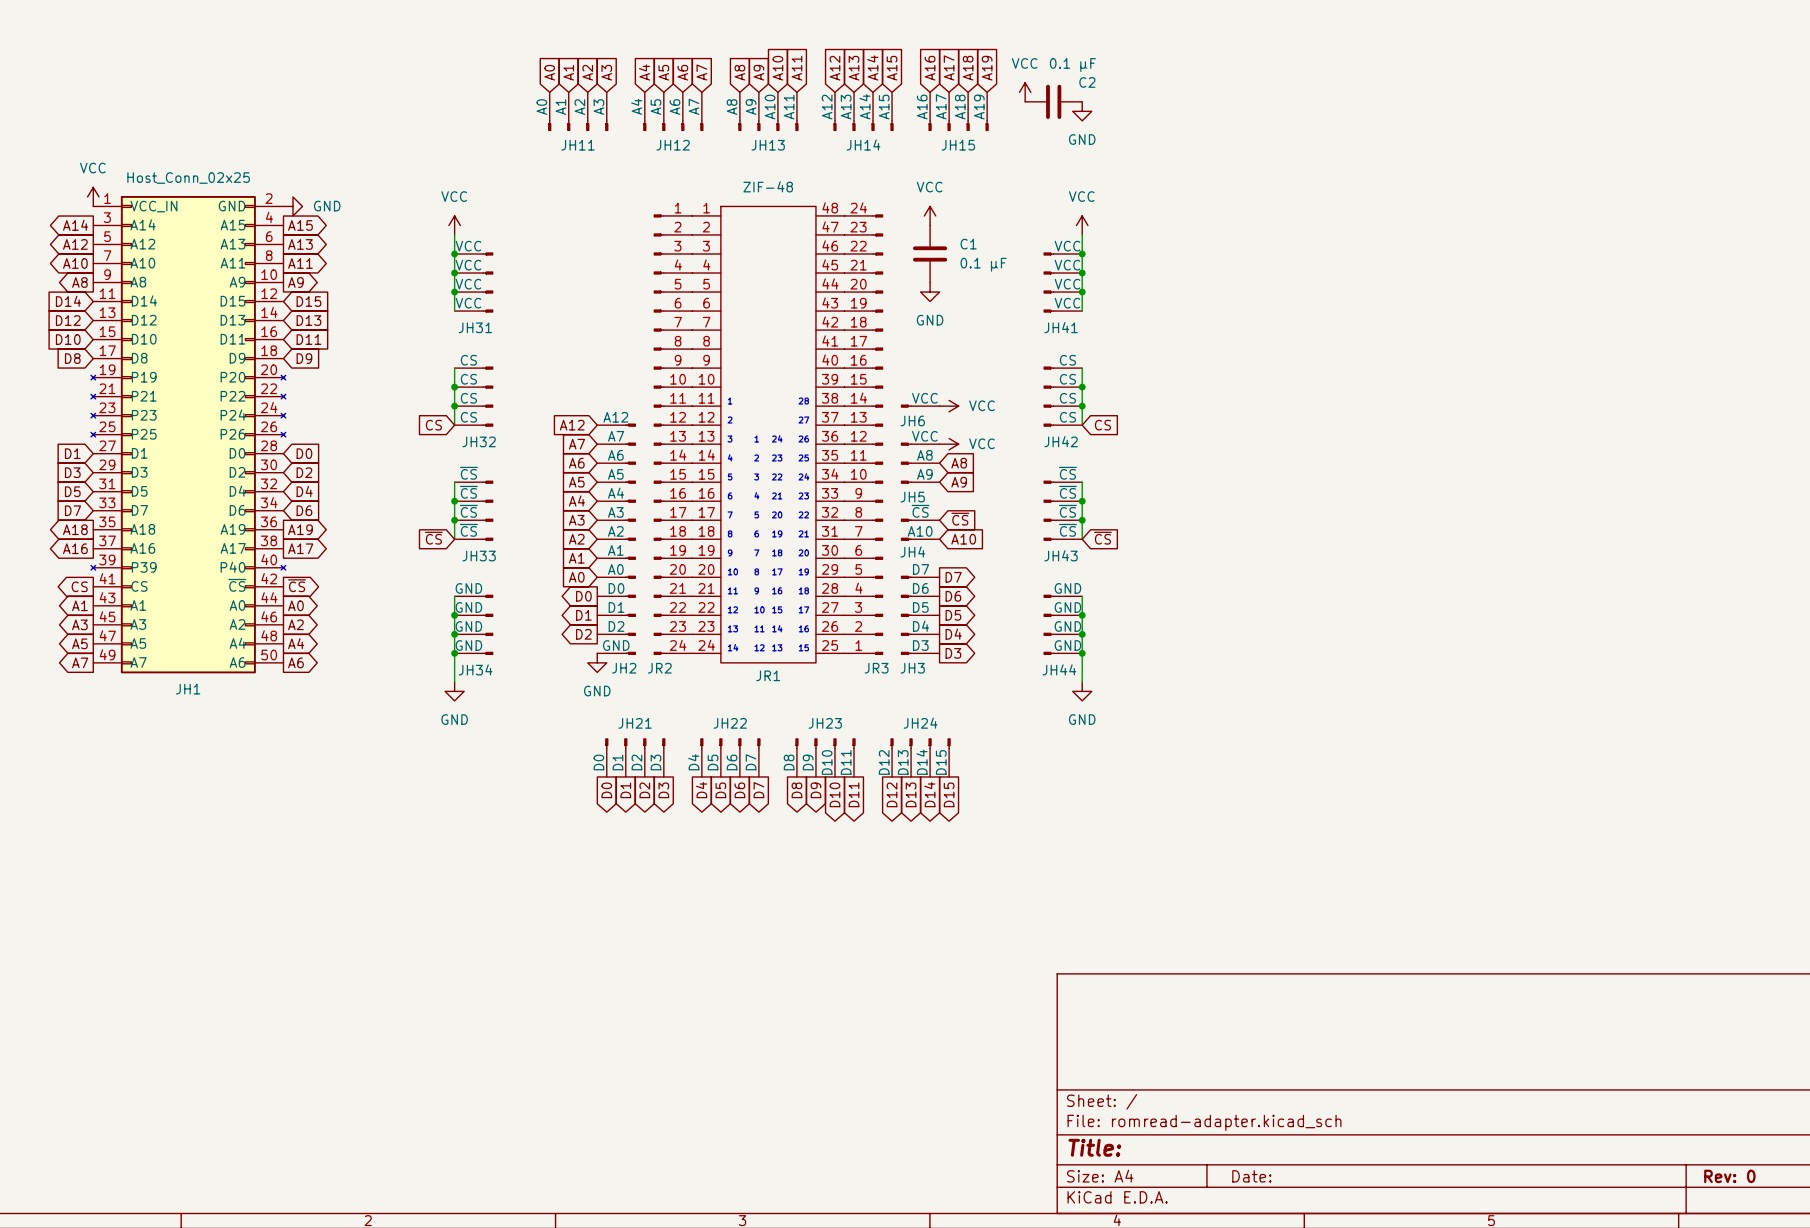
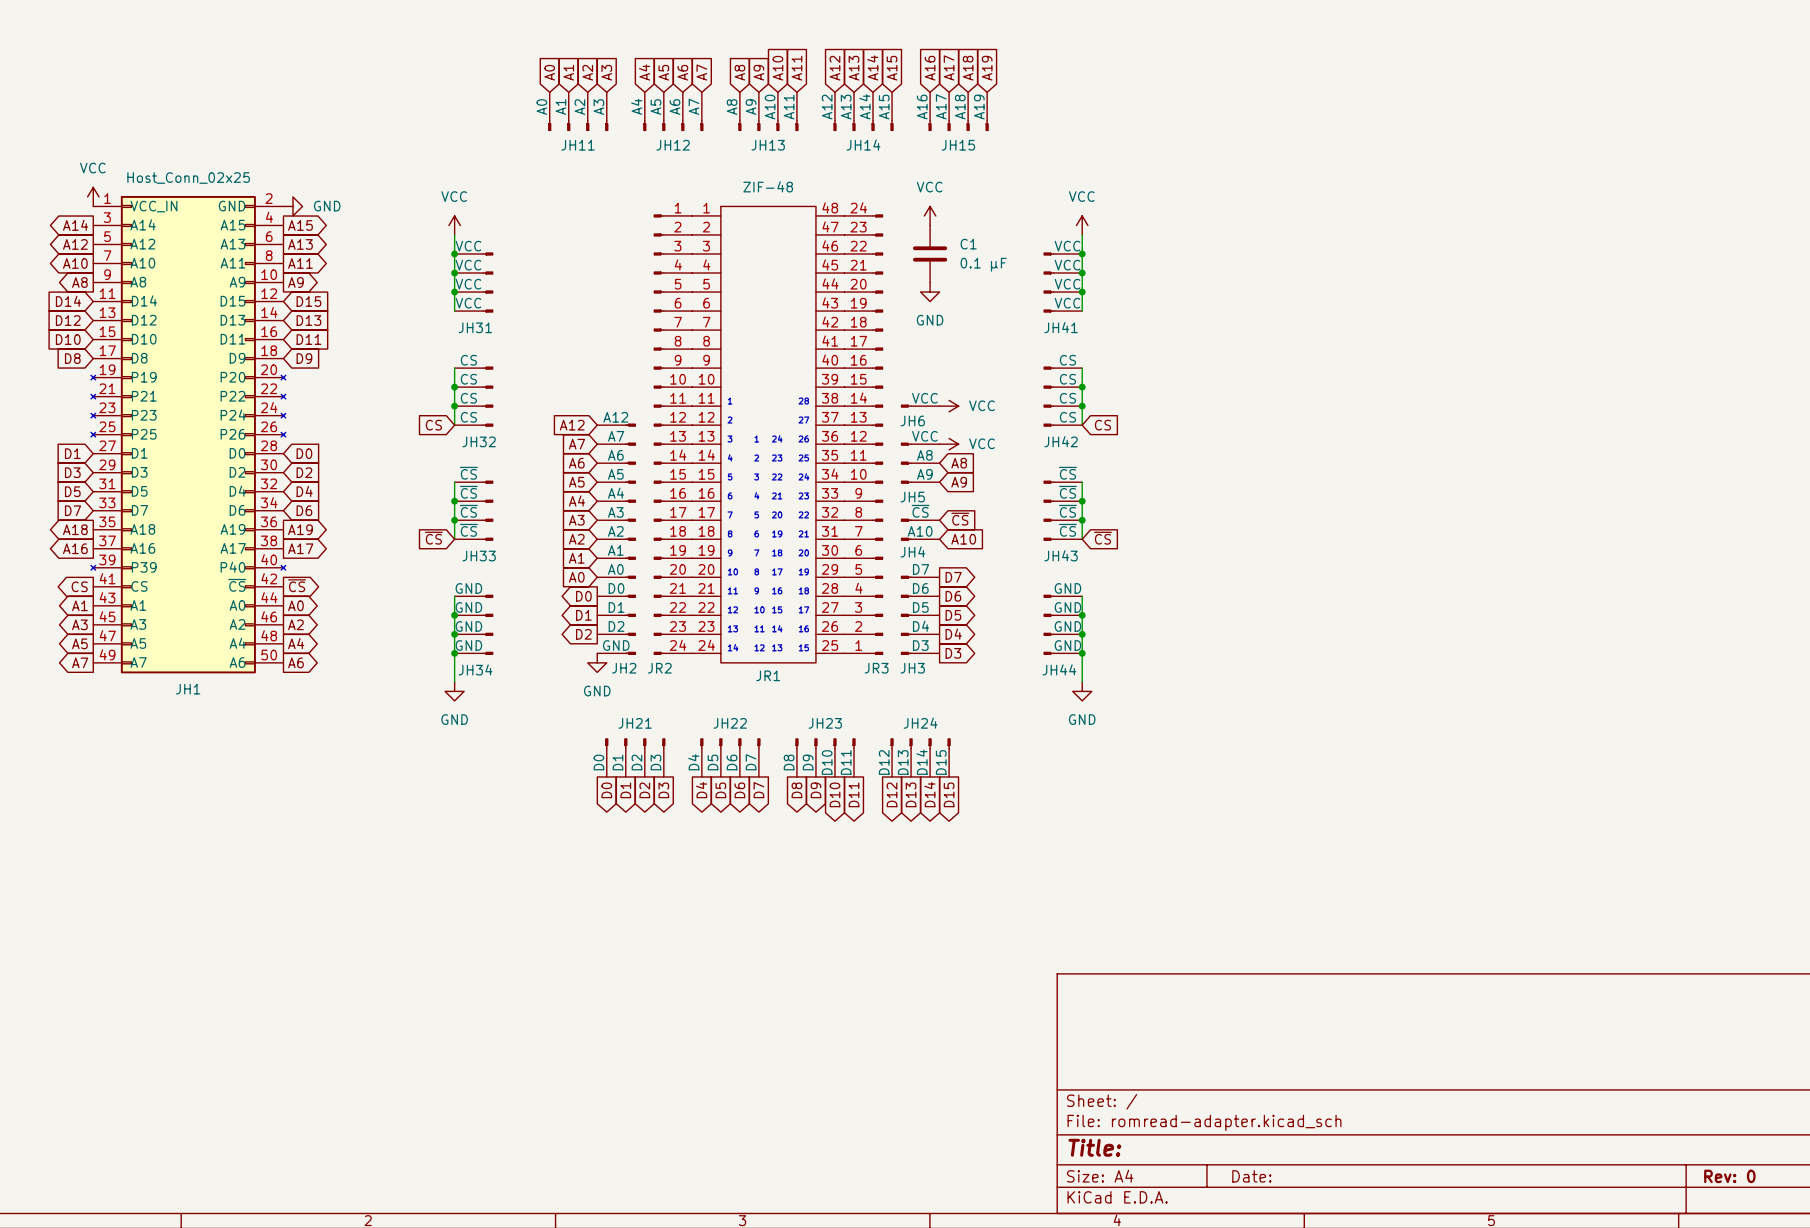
power symbol: VCC (1025, 92) -> none
C2: 0.1 μF (1053, 101) -> none
power symbol: GND (1082, 111) -> none

